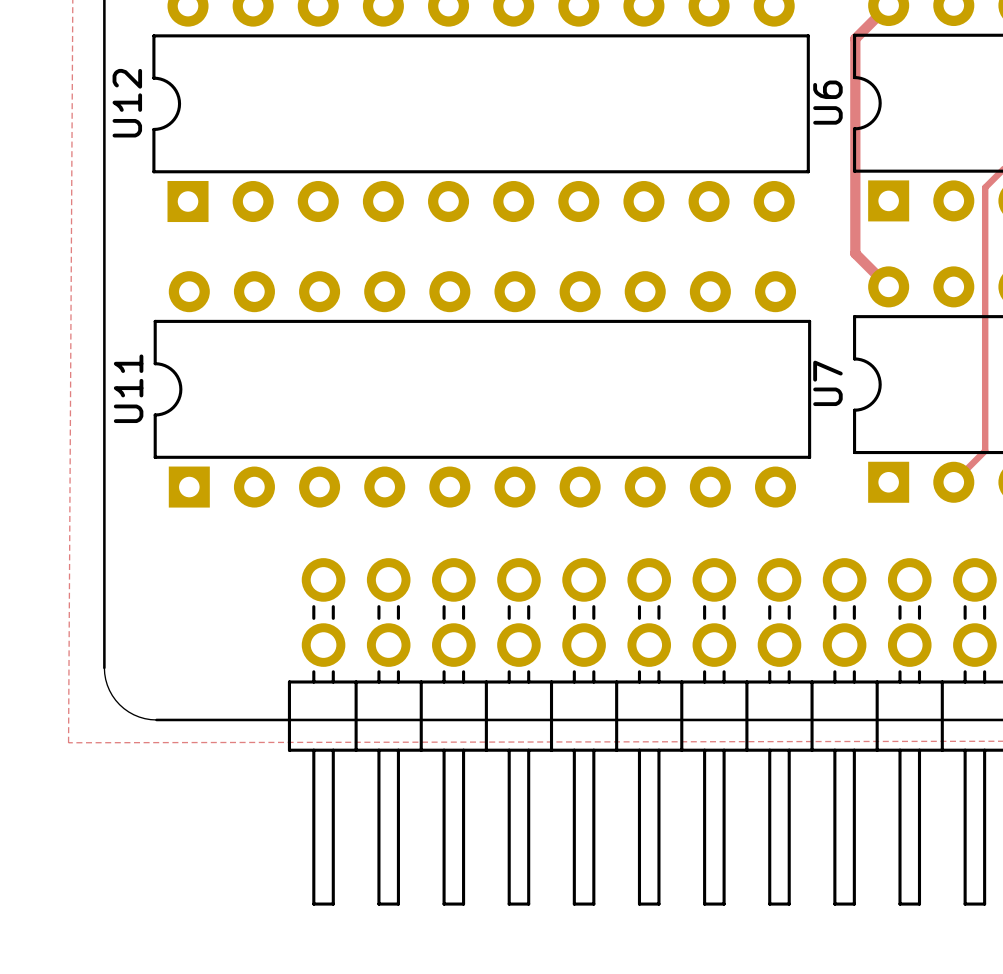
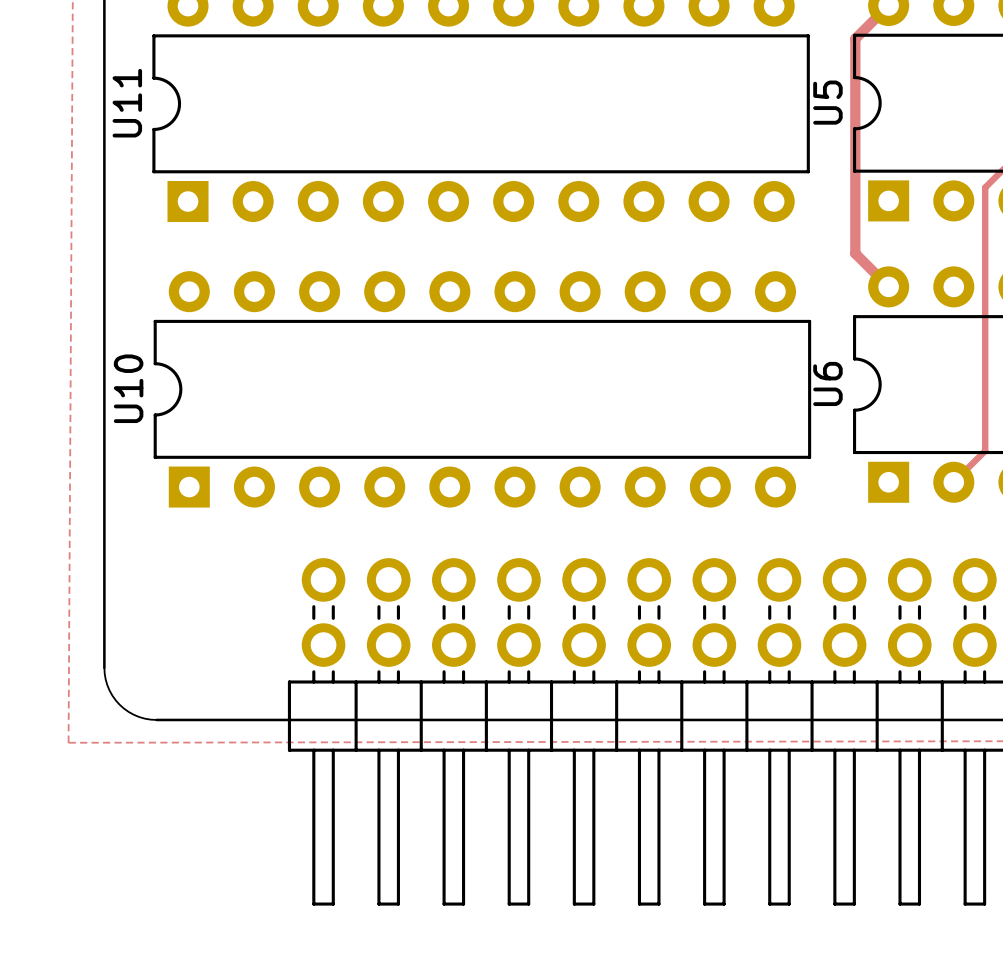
U6 name: U6 (827, 102) -> U5 (827, 102)
U12 name: U12 (127, 103) -> U11 (127, 103)
U7 name: U7 (827, 383) -> U6 (827, 383)
U11 name: U11 (128, 388) -> U10 (128, 388)

